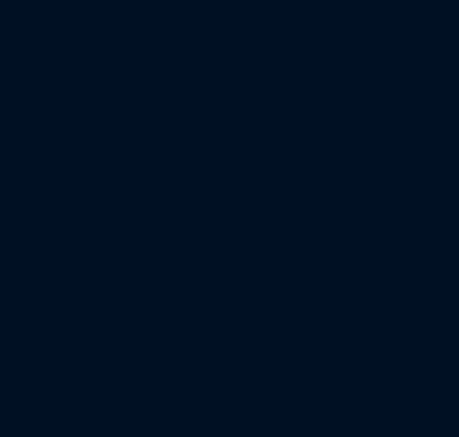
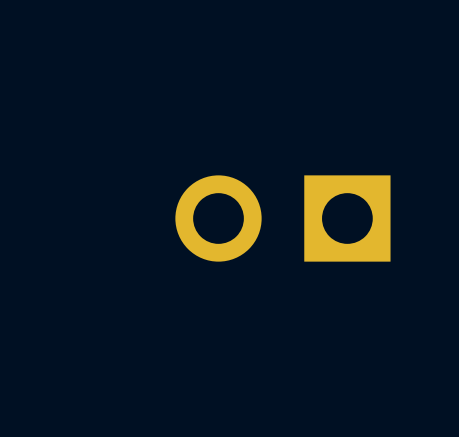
part: none -> (282, 218)

